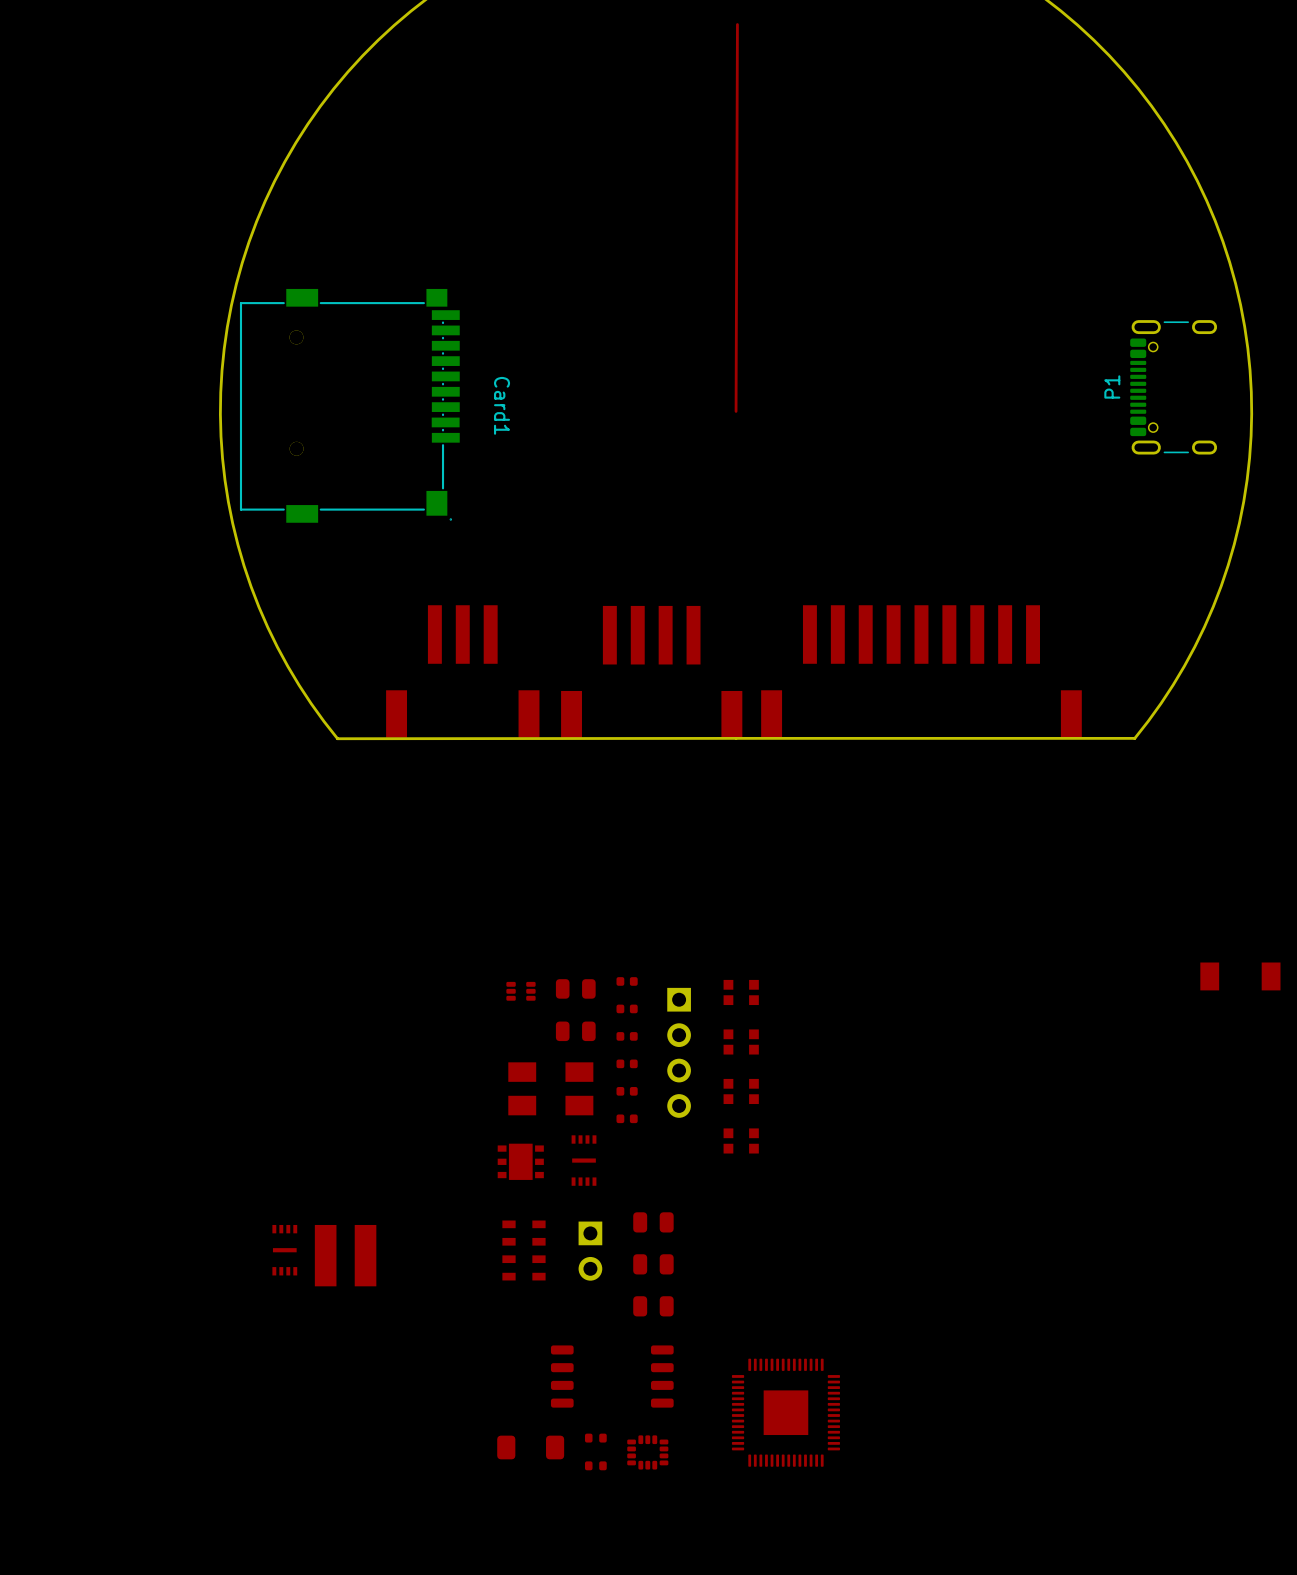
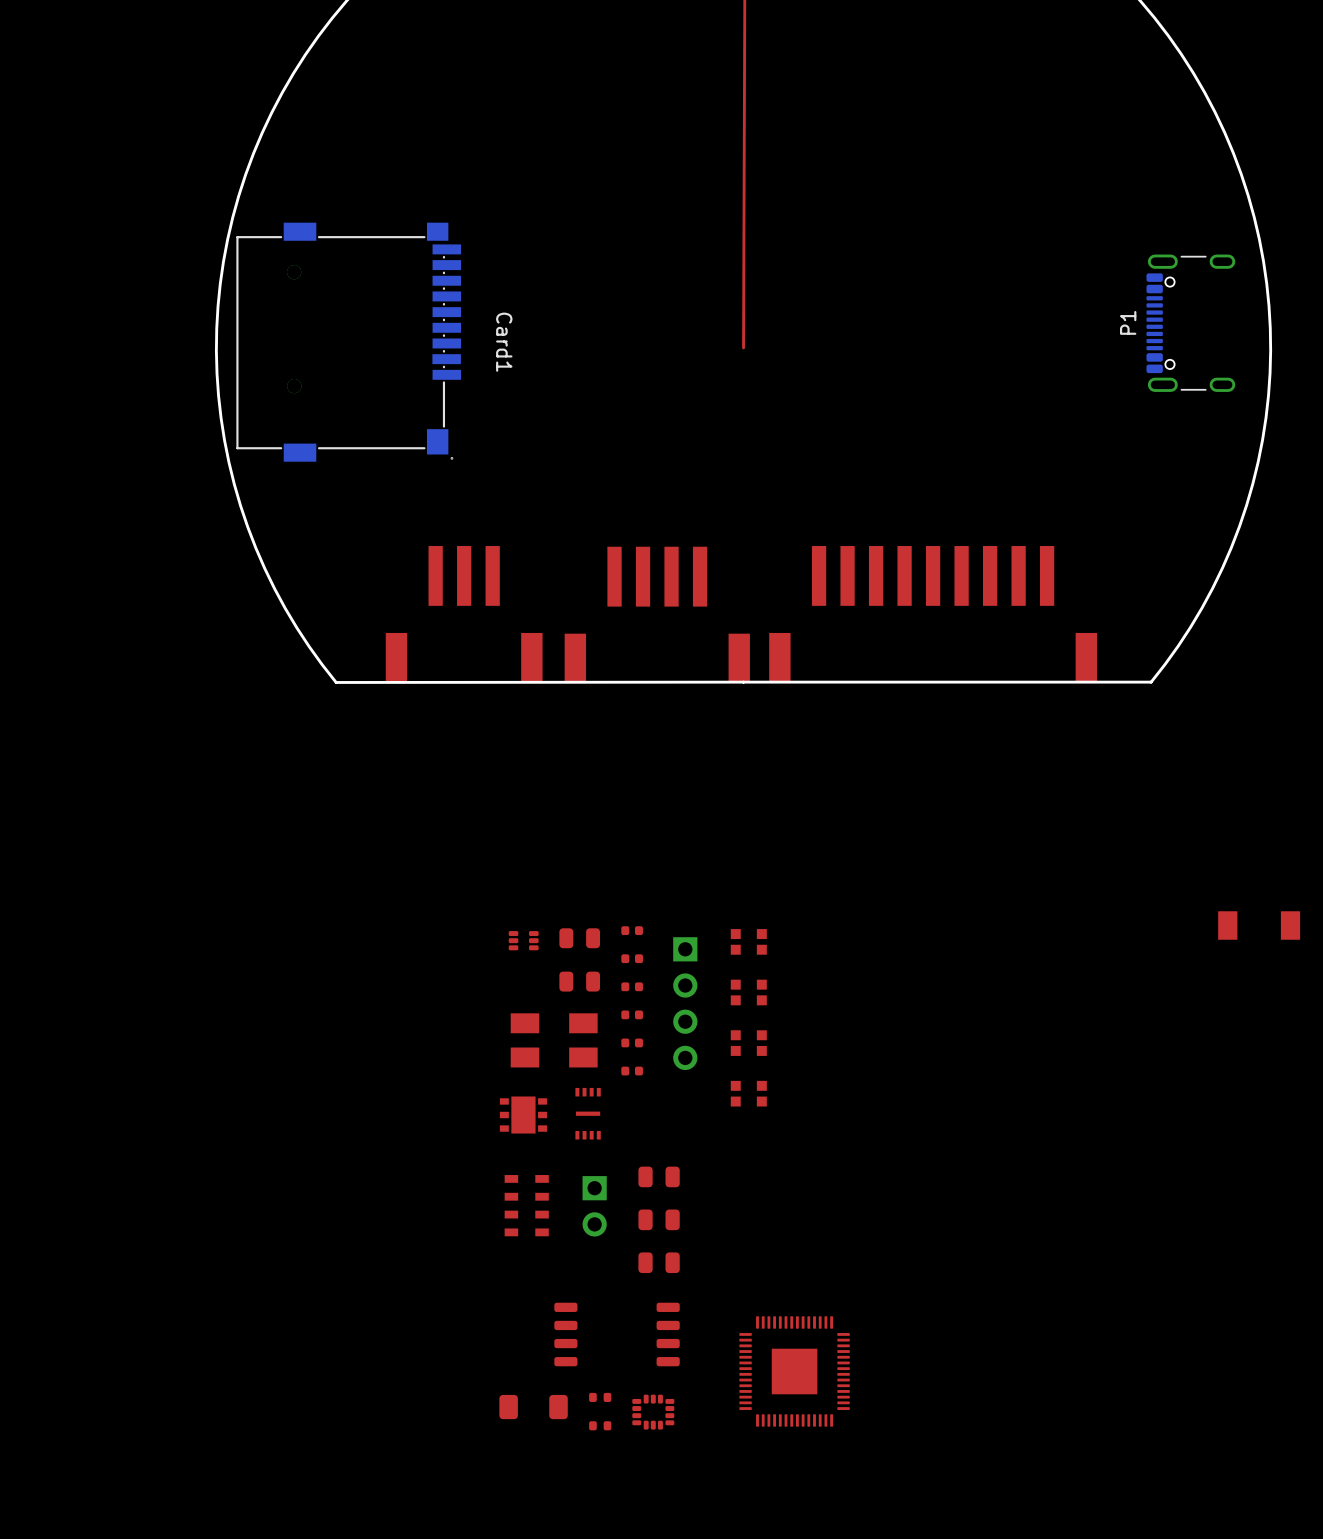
part: (284, 1250) -> none
part: (345, 1255) -> none

